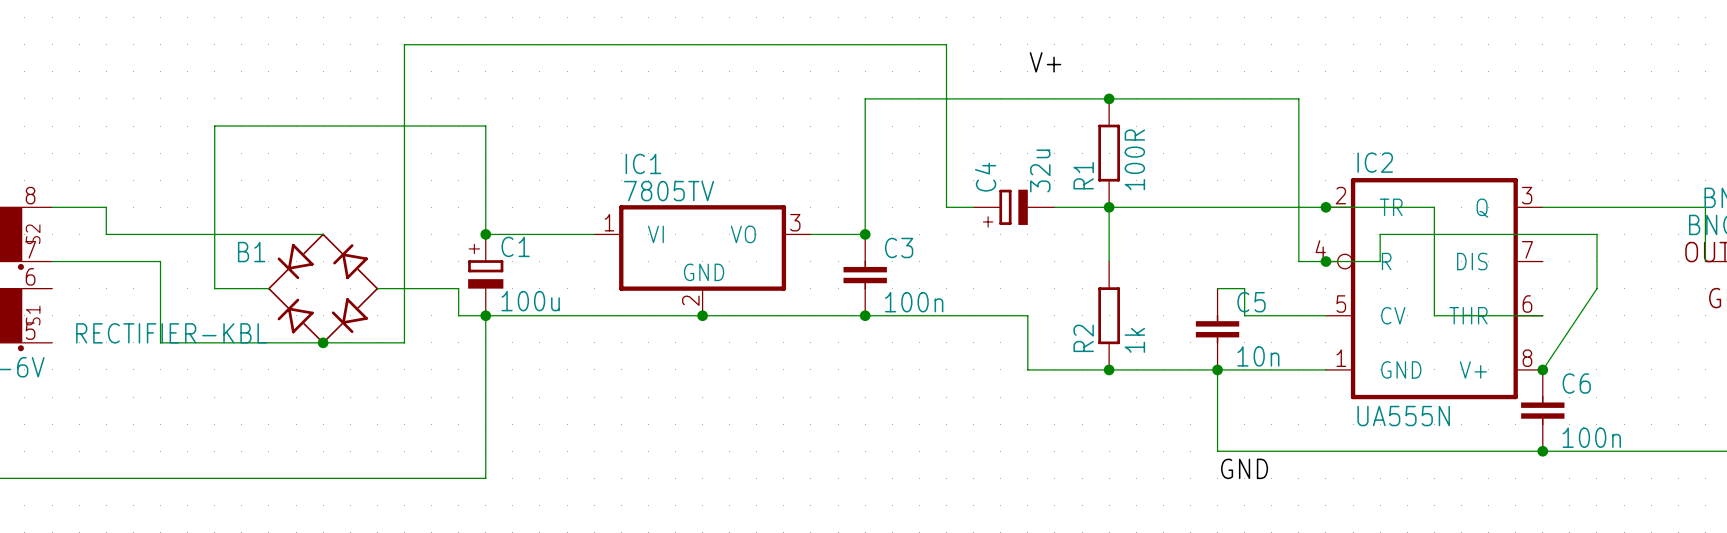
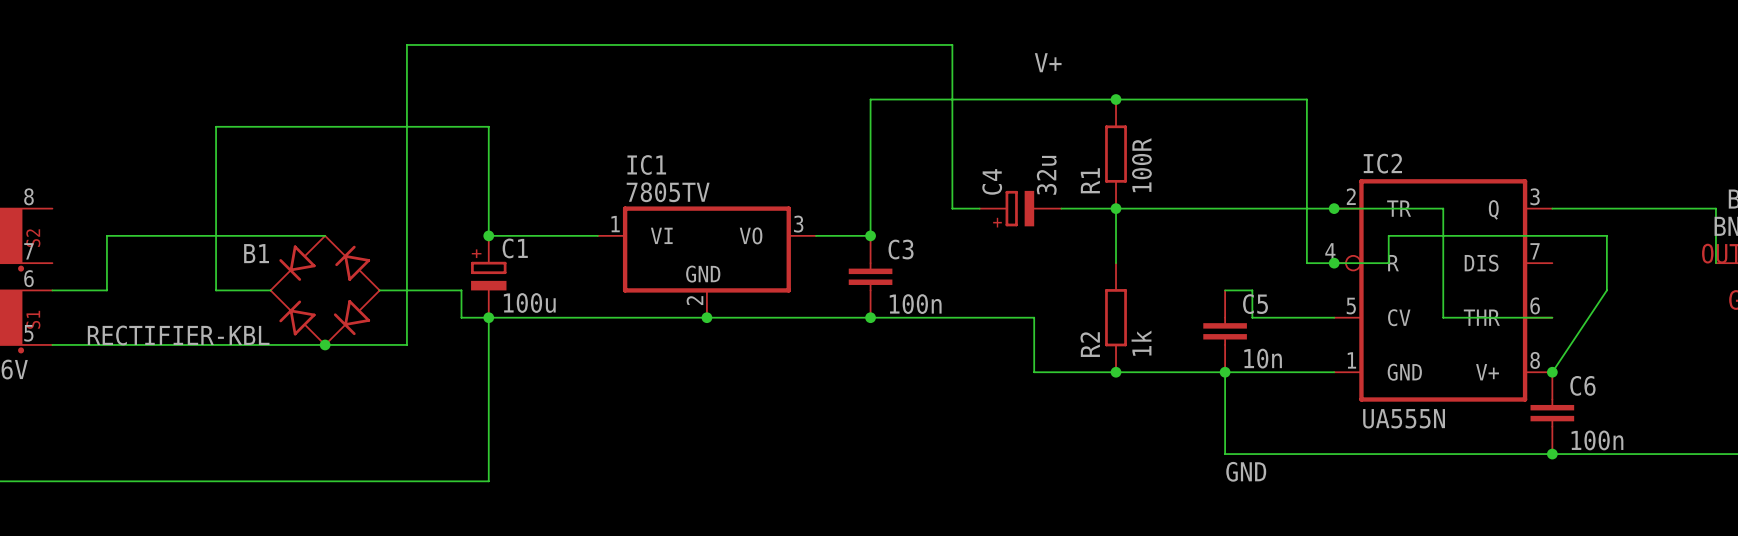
wire: (52, 207) (106, 207) (106, 234) -> (52, 290) (106, 290) (106, 235)
wire: (52, 261) (160, 261) (160, 342) -> (52, 344) (161, 344)

